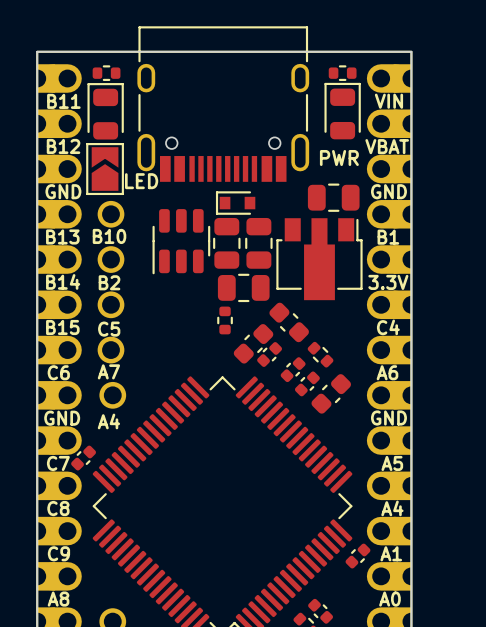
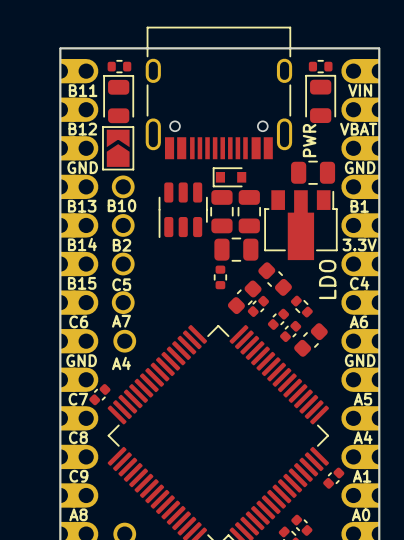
part value rotation: 0° (339, 158) -> 90° counterclockwise (309, 140)
text: LED (141, 181) -> none
part text: none -> LDO (327, 279)

